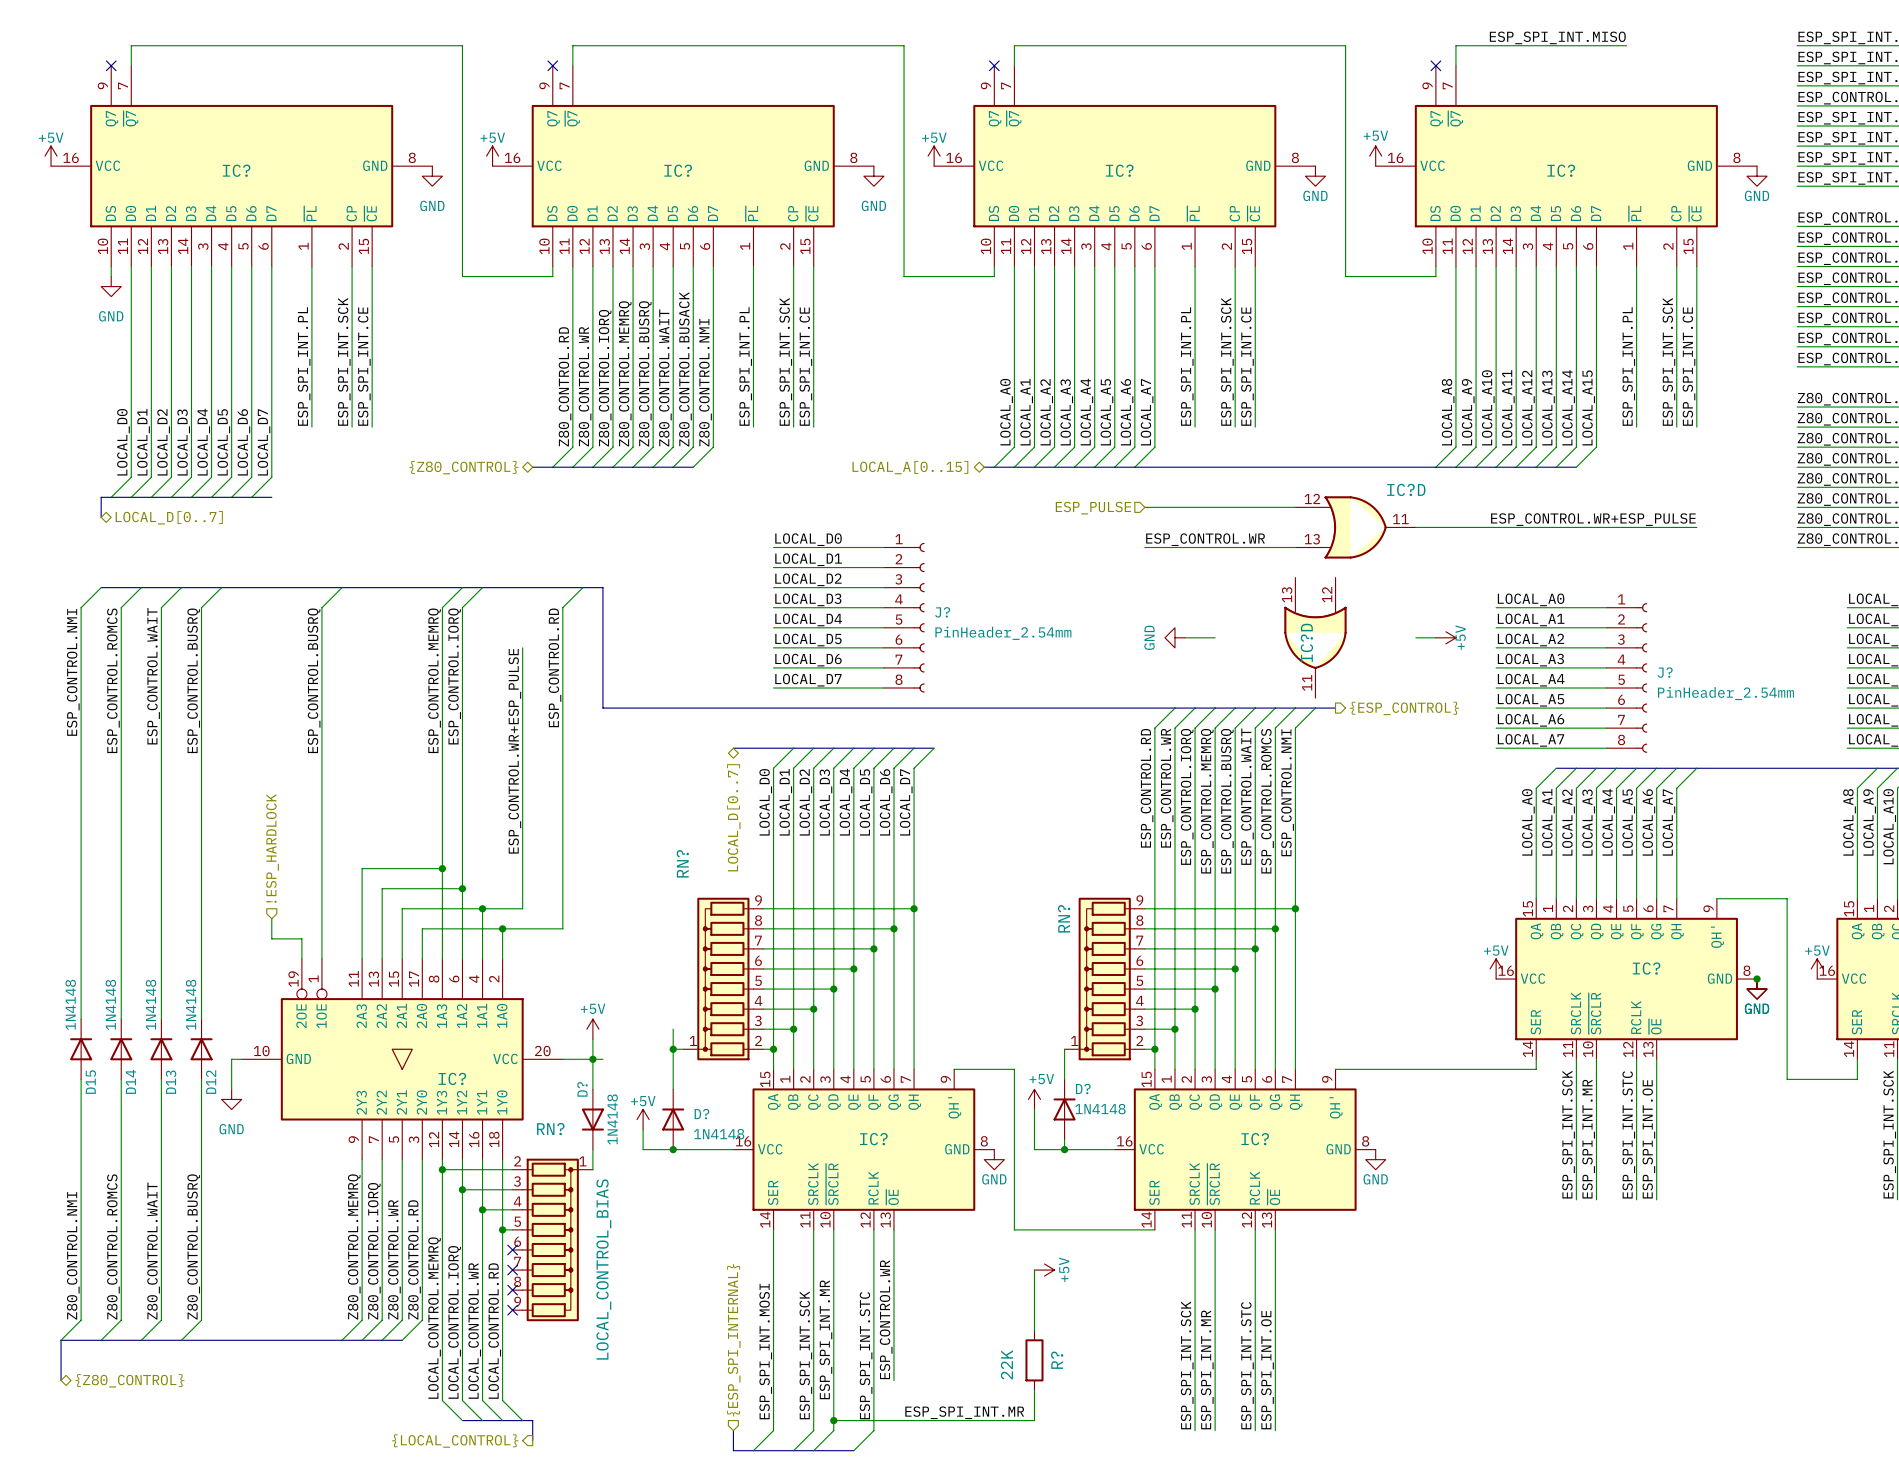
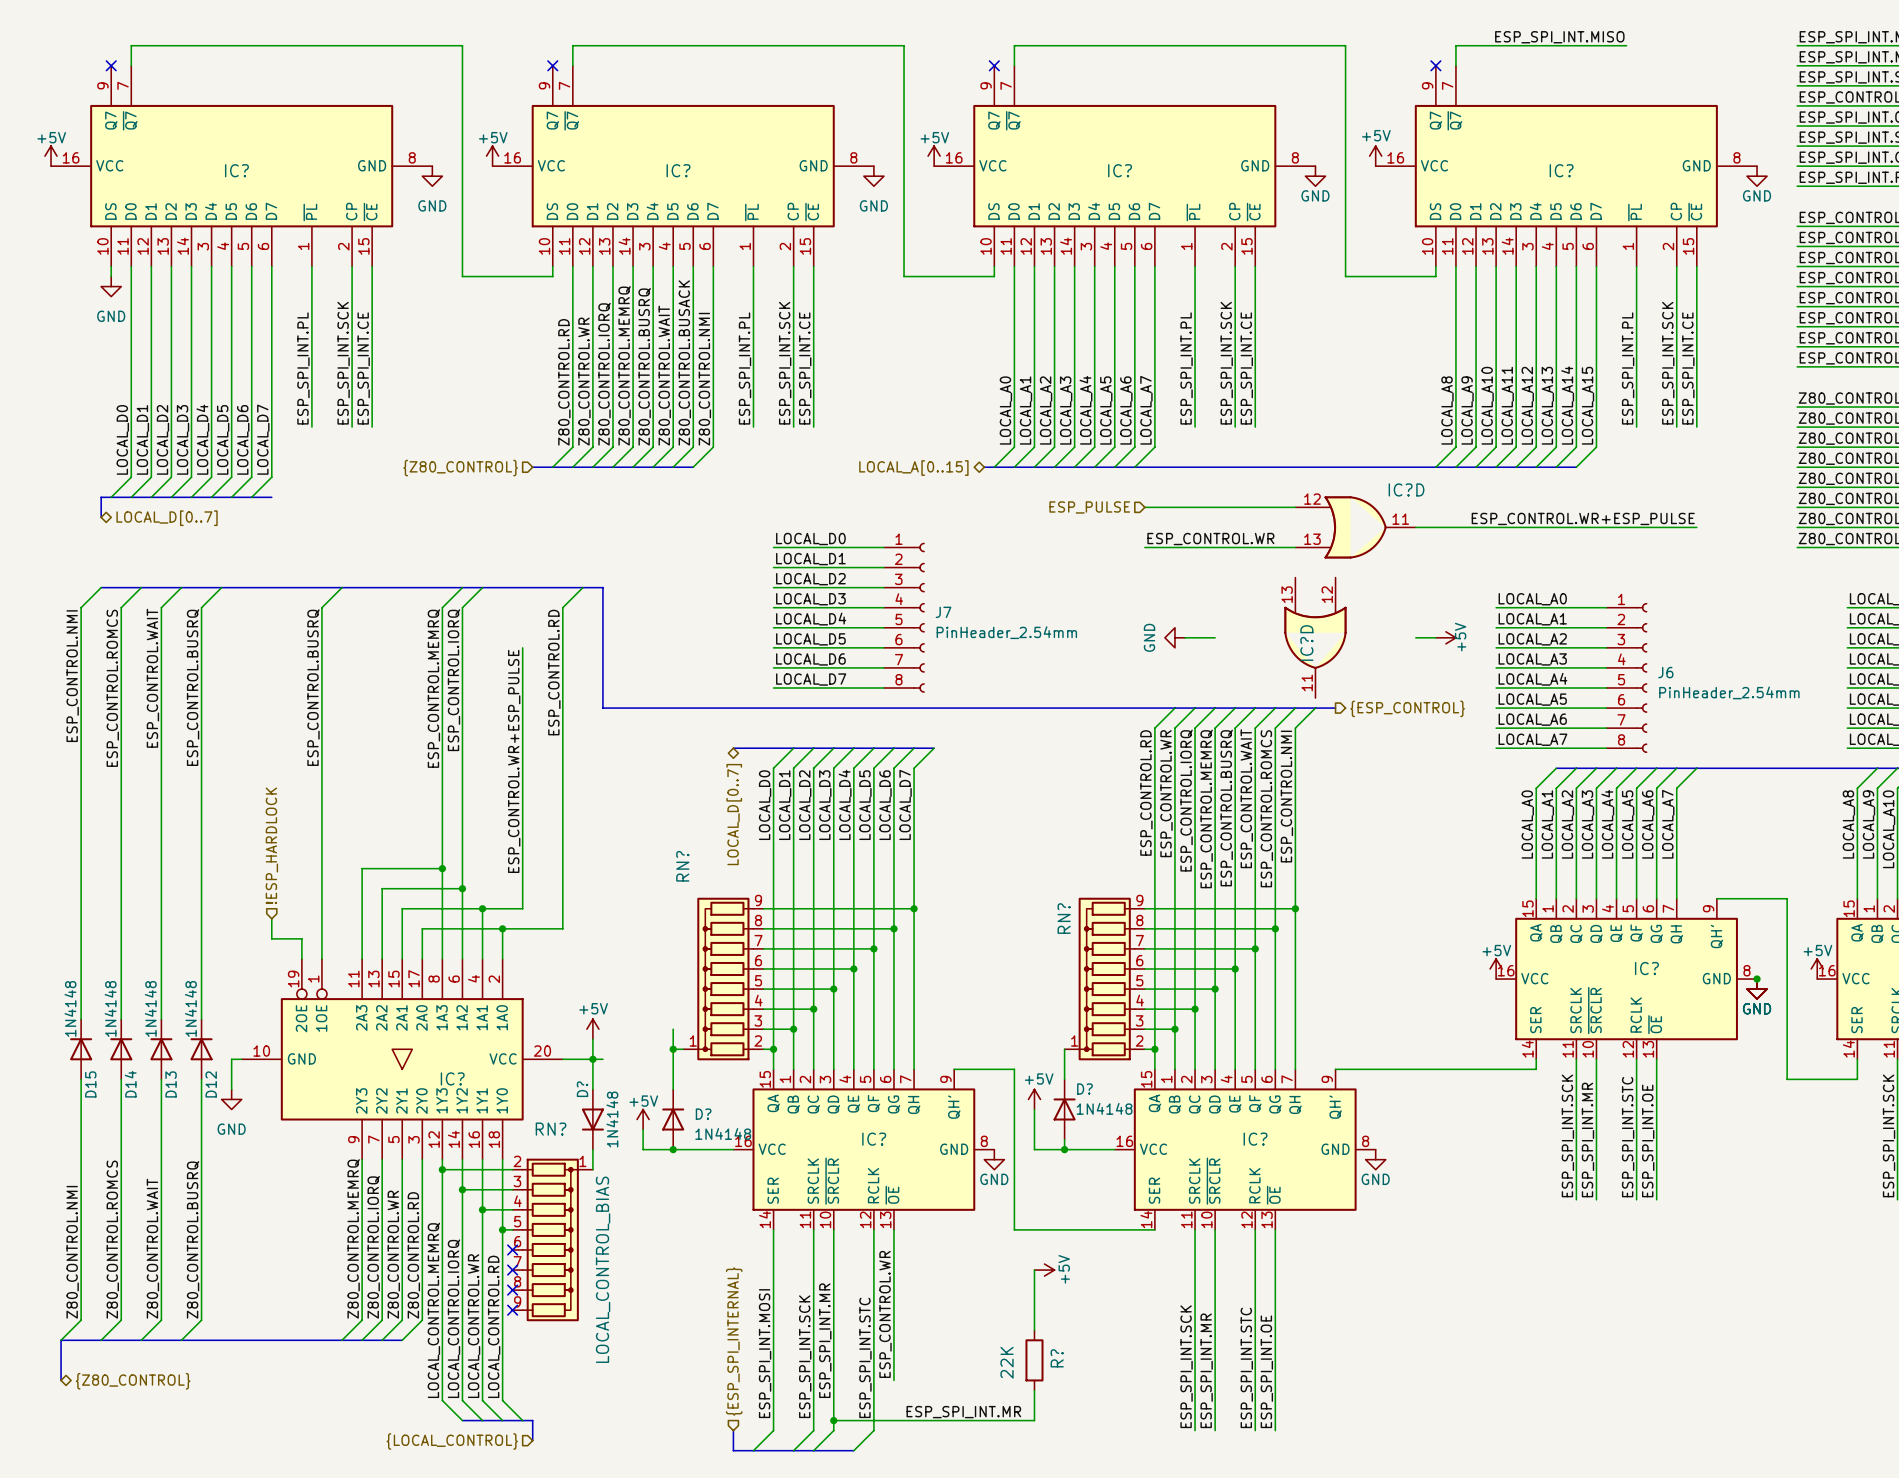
hierarchical label shape: bidirectional (463, 467) -> input (460, 468)
J? name: J? (942, 612) -> J7 (943, 612)
J? name: J? (1665, 672) -> J6 (1665, 672)
hierarchical label shape: output (455, 1441) -> input (452, 1441)

